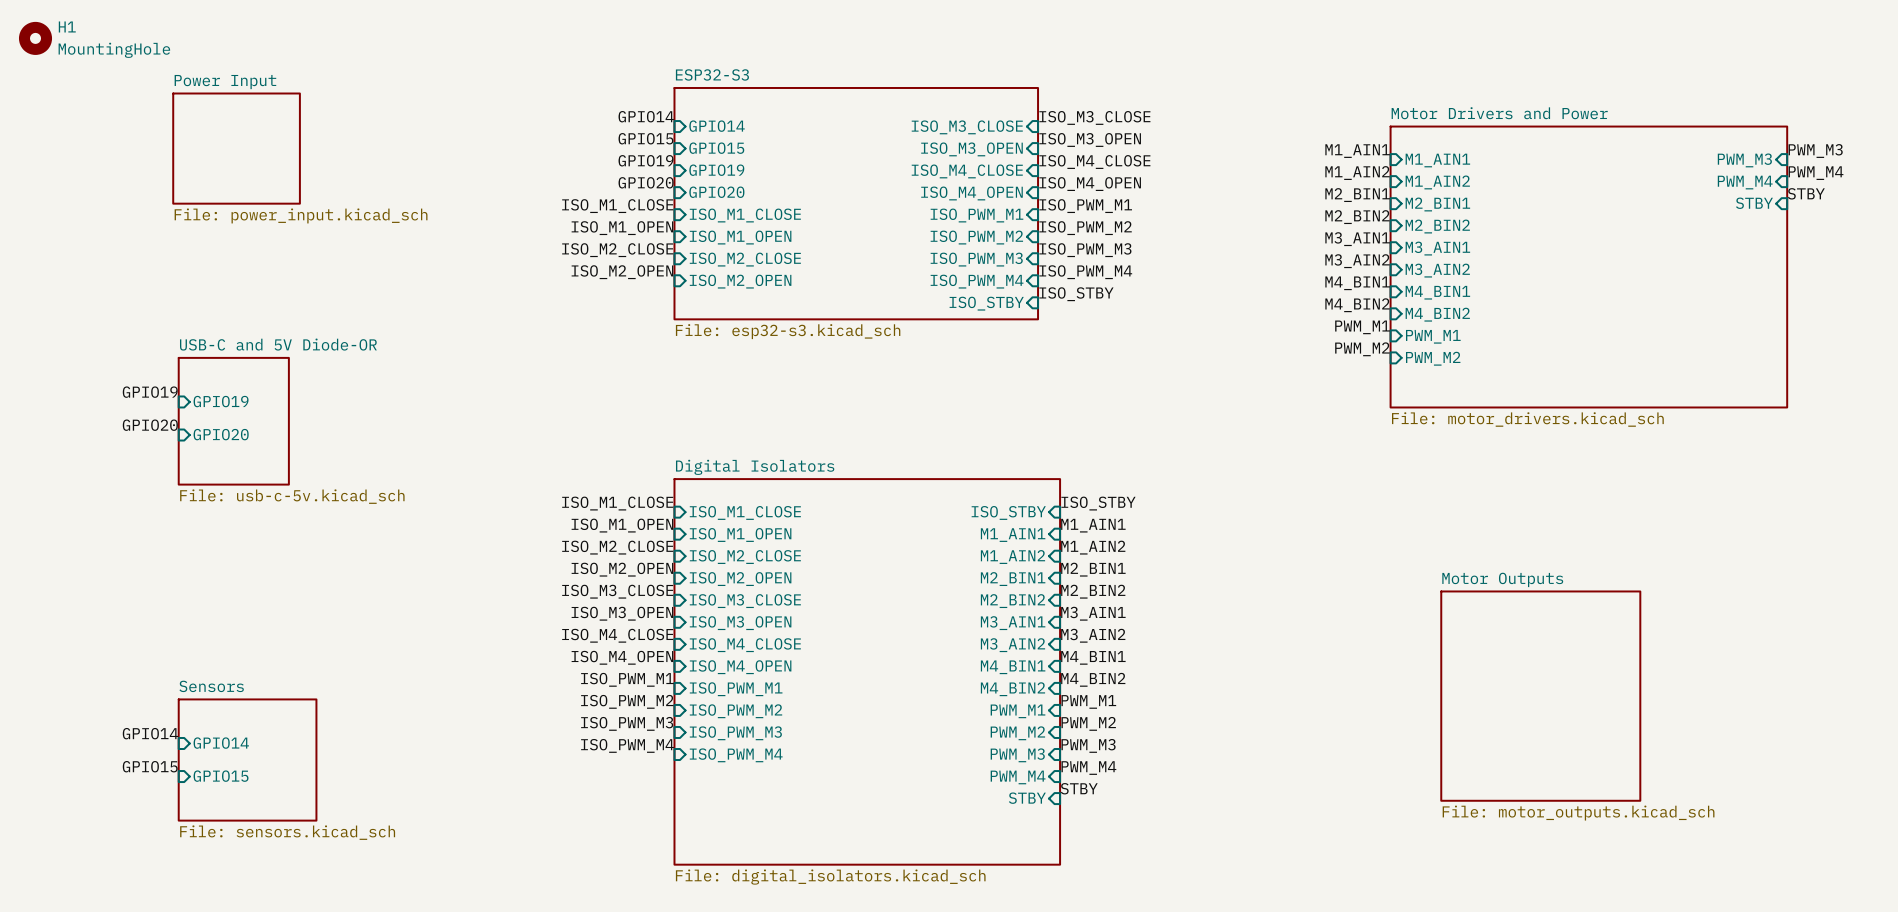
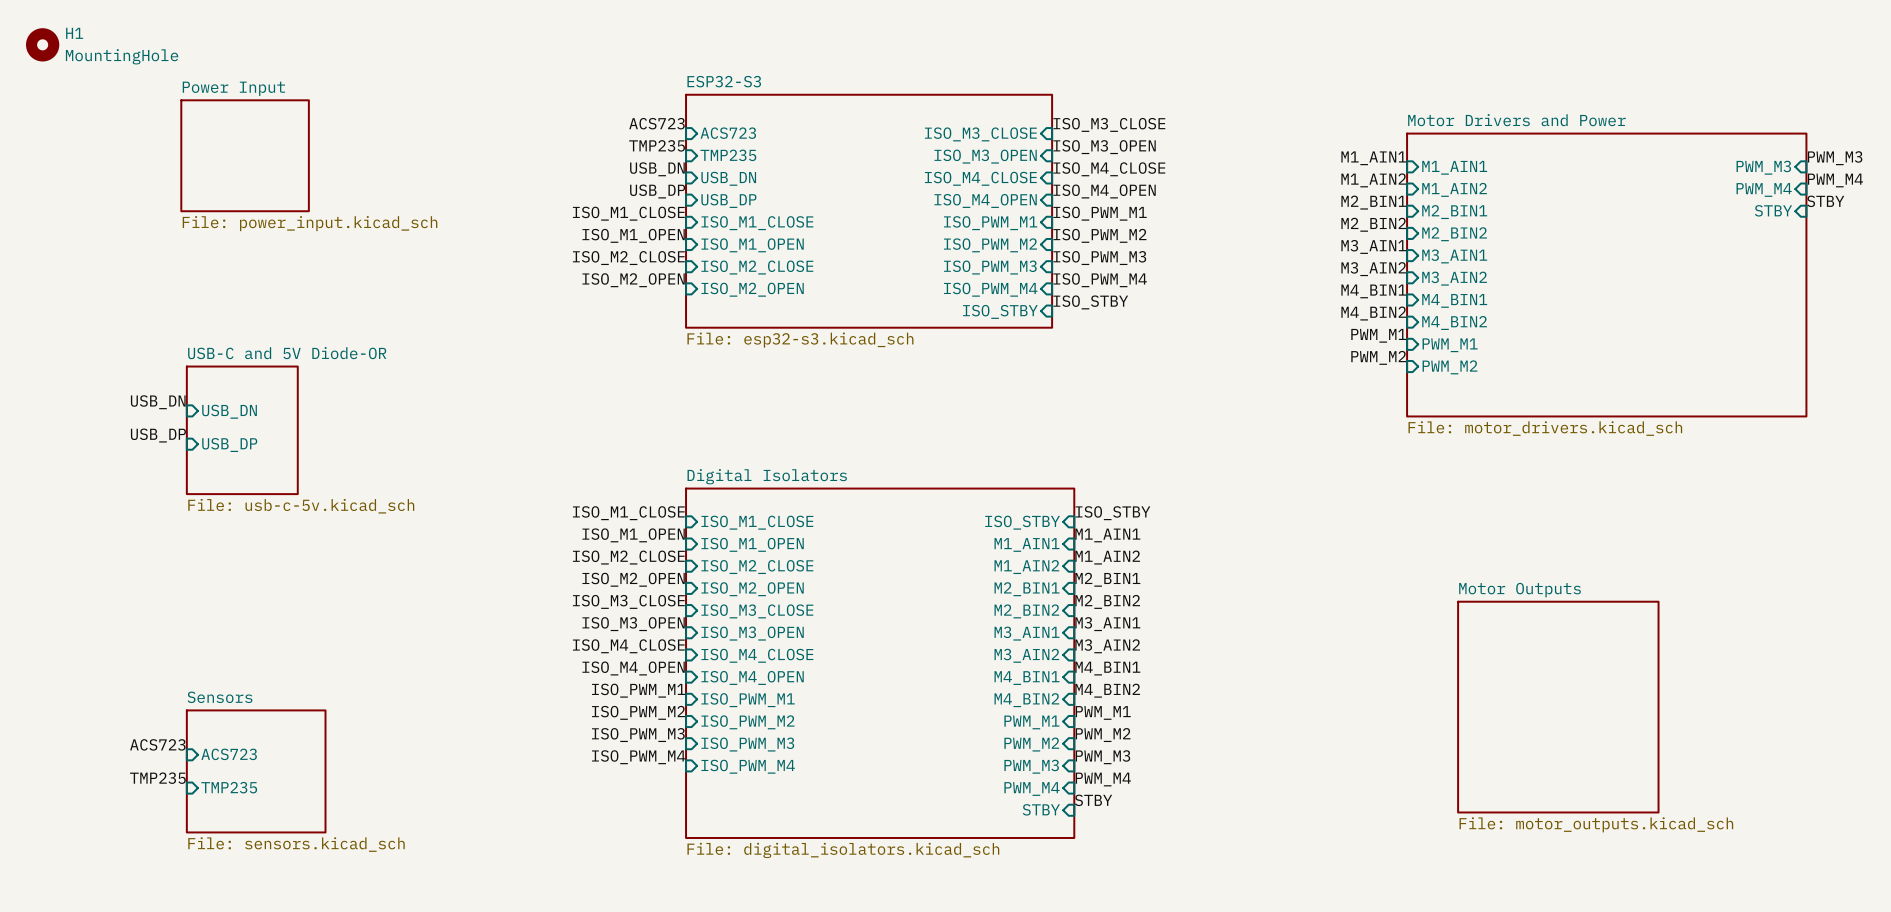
label: GPIO14 (646, 116) -> ACS723 (657, 123)
sheet pin: GPIO14 (717, 126) -> ACS723 (728, 133)
label: GPIO15 (645, 138) -> TMP235 (657, 145)
sheet pin: GPIO15 (716, 148) -> TMP235 (728, 155)
label: GPIO19 (646, 160) -> USB_DN (657, 169)
sheet pin: GPIO19 (716, 170) -> USB_DN (728, 178)
label: GPIO20 (646, 182) -> USB_DP (657, 191)
sheet pin: GPIO20 (716, 192) -> USB_DP (728, 200)
label: GPIO19 (150, 392) -> USB_DN (158, 402)
sheet pin: GPIO19 (221, 401) -> USB_DN (229, 411)
label: GPIO20 (150, 425) -> USB_DP (158, 435)
sheet pin: GPIO20 (221, 434) -> USB_DP (229, 445)
sheet Digital Isolators: none -> File: digital_isolators.kicad_sch (880, 663)
sheet Digital Isolators: File: digital_isolators.kicad_sch (867, 671) -> none
label: GPIO14 (150, 733) -> ACS723 (157, 744)
sheet pin: GPIO14 (221, 743) -> ACS723 (229, 754)
label: GPIO15 (150, 766) -> TMP235 (157, 778)
sheet pin: GPIO15 (221, 776) -> TMP235 (229, 787)

